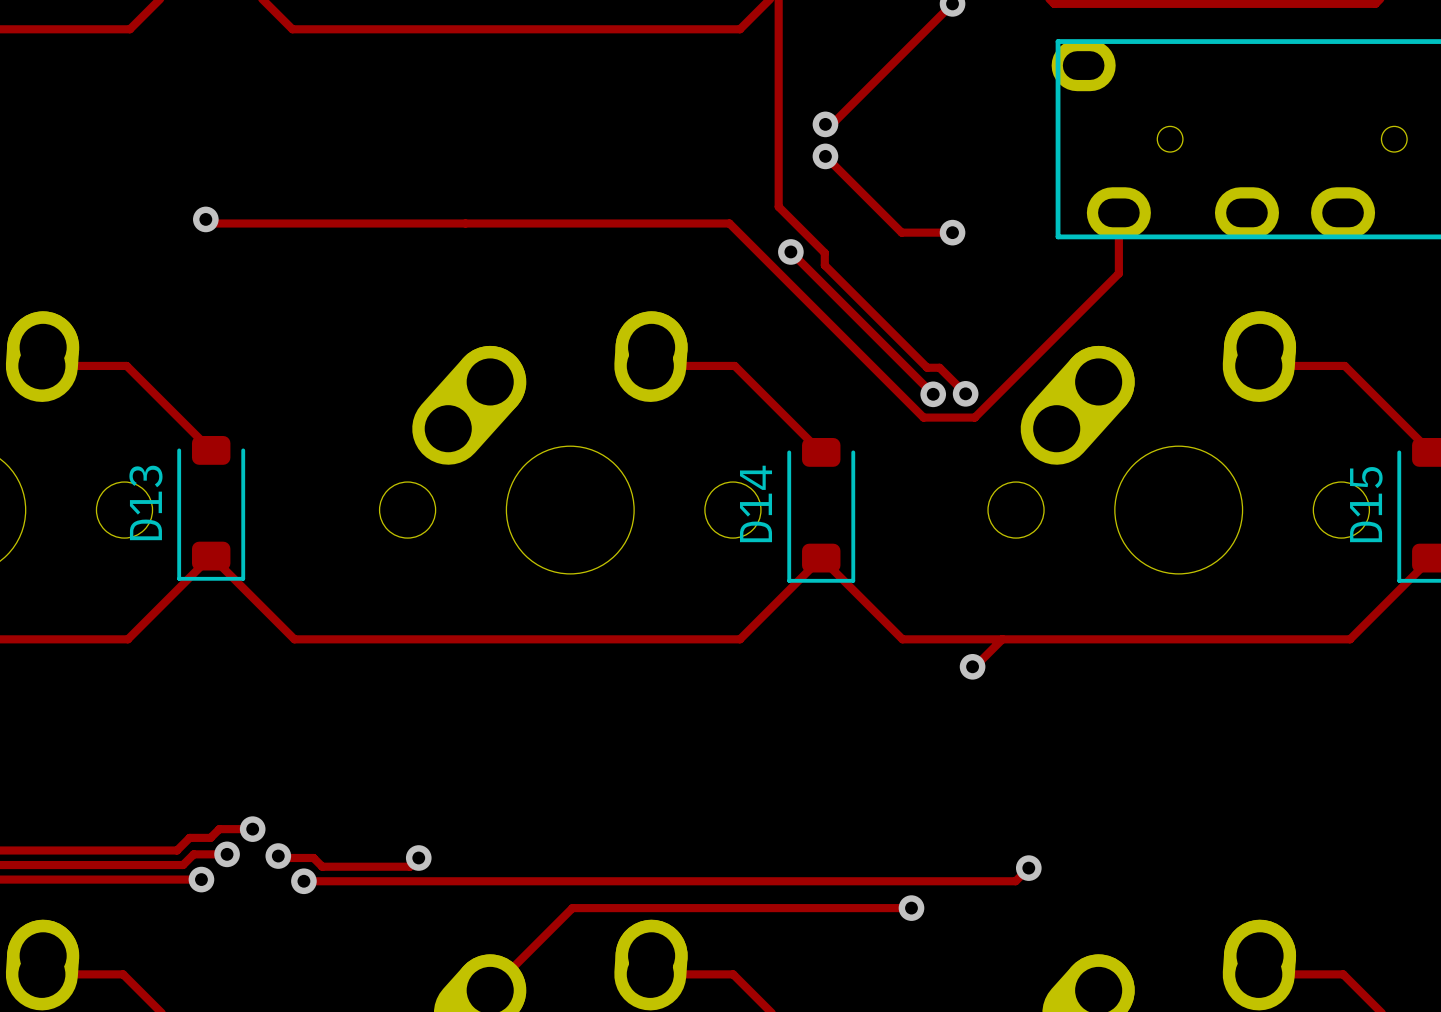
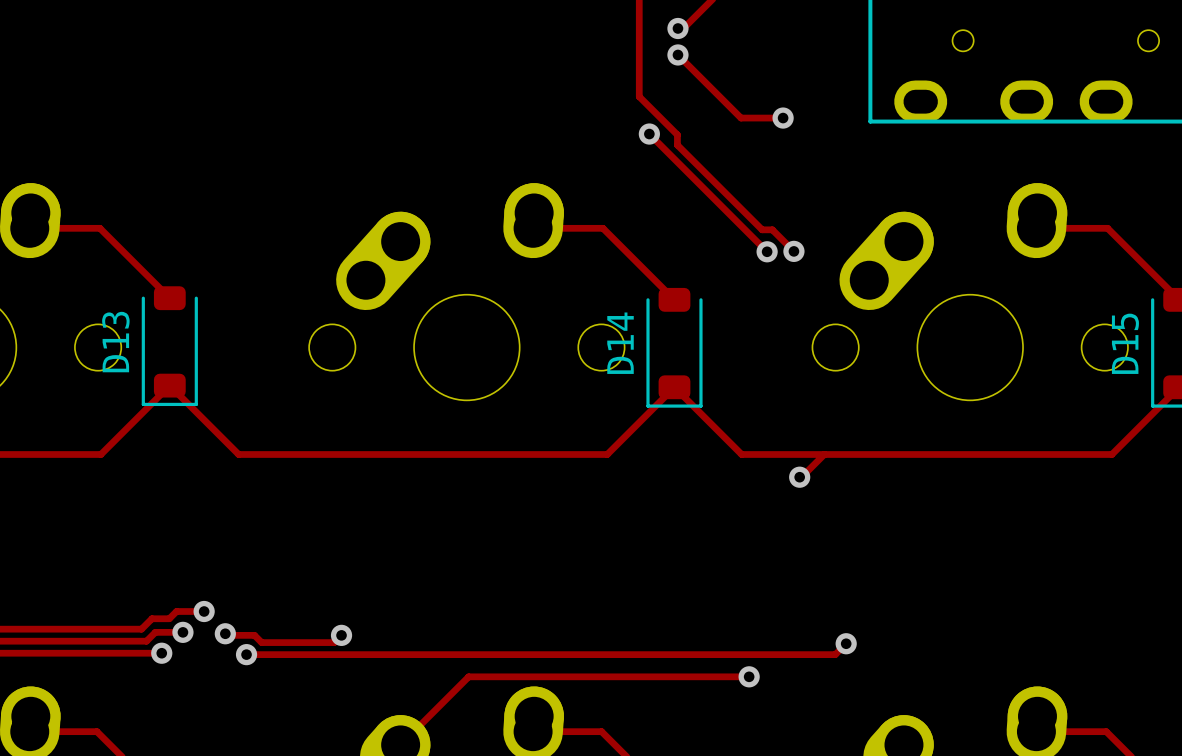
track: (1118, 212) (1118, 273) (974, 417) (923, 417) (729, 223) (209, 223) (205, 219) -> none
via: (205, 219) -> none

